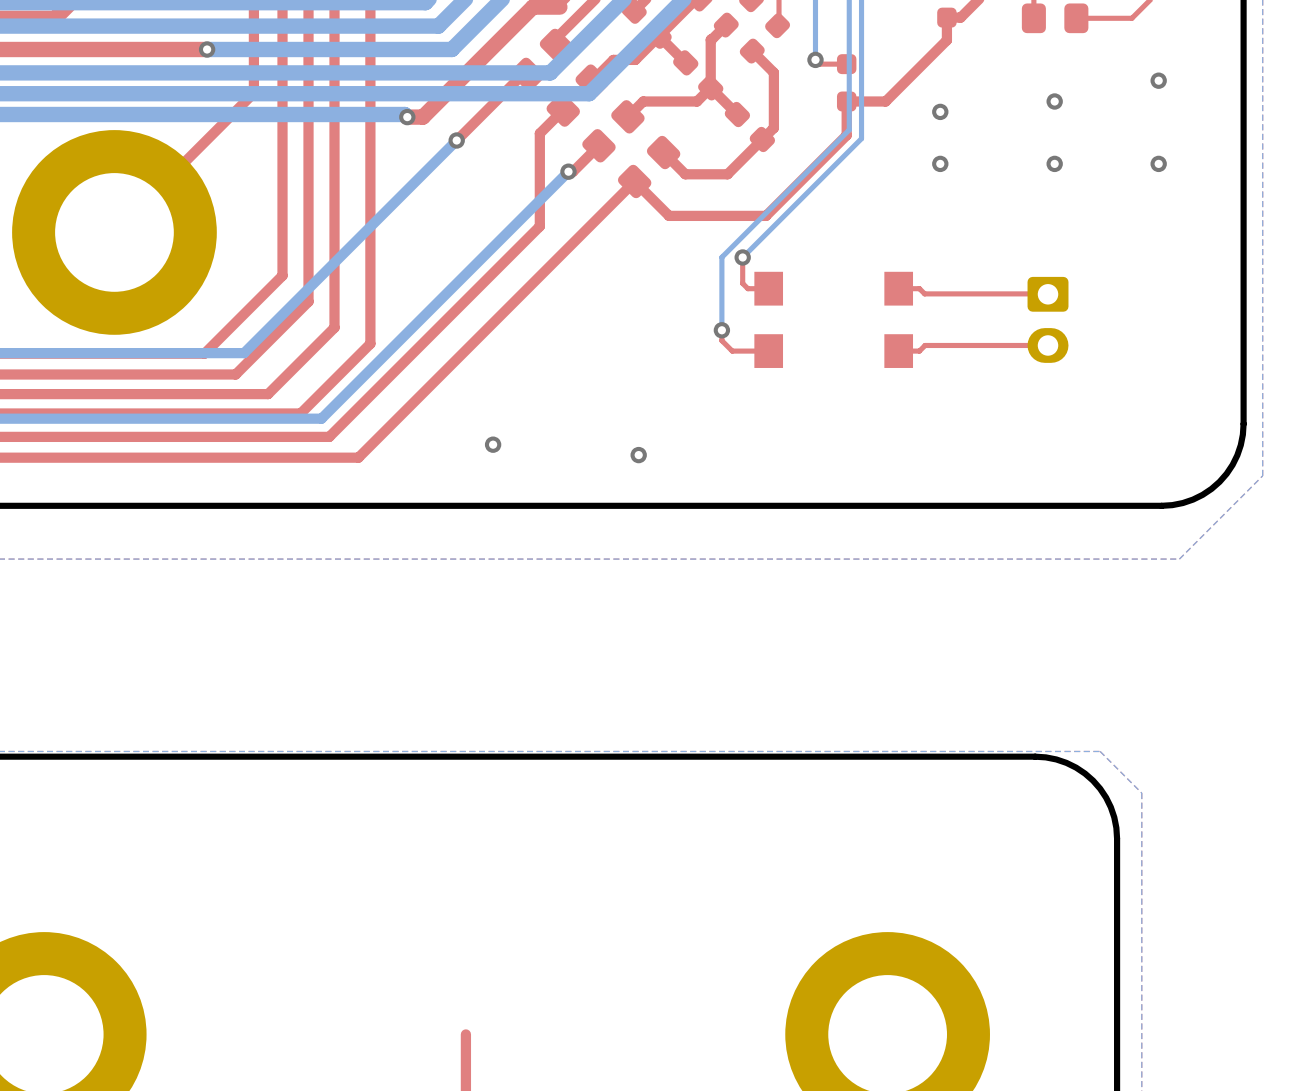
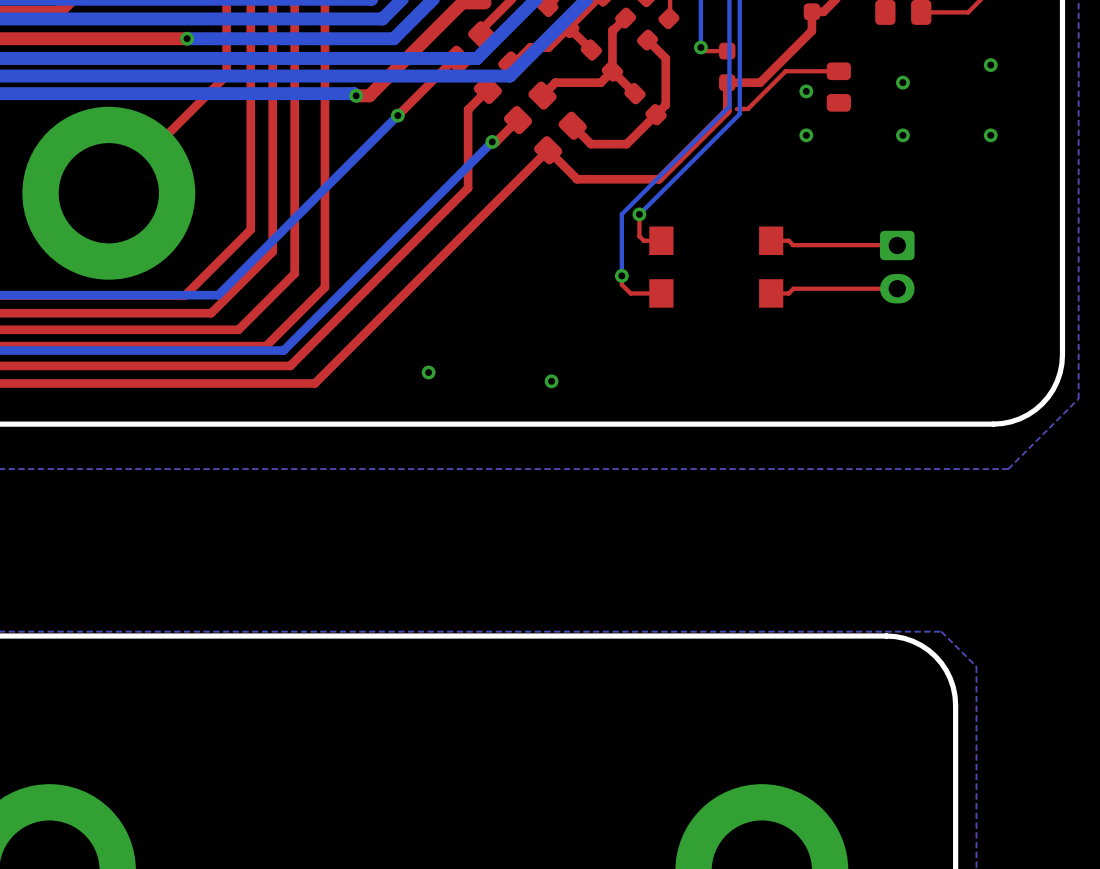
top track: none -> (838, 71) (785, 71) (747, 109) (737, 109)
part: none -> (838, 87)

